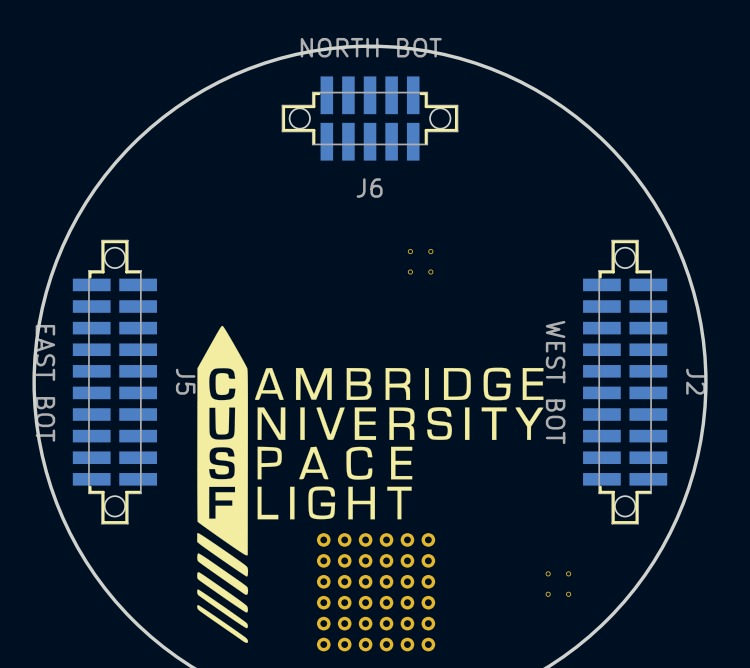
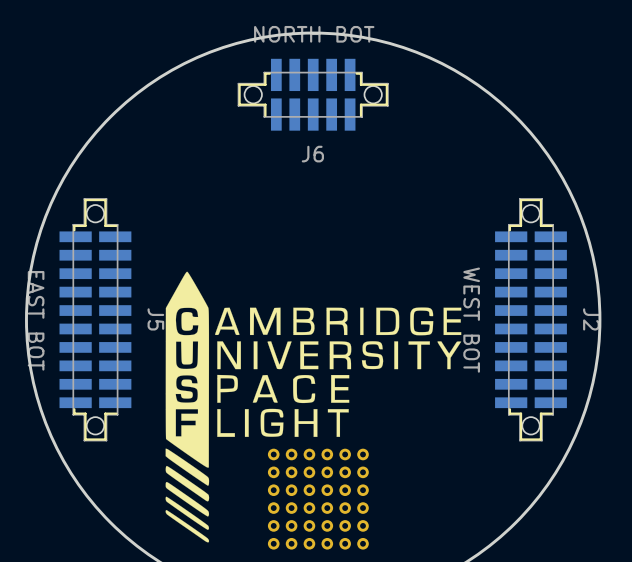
part: (420, 261) -> none
part: (558, 584) -> none

